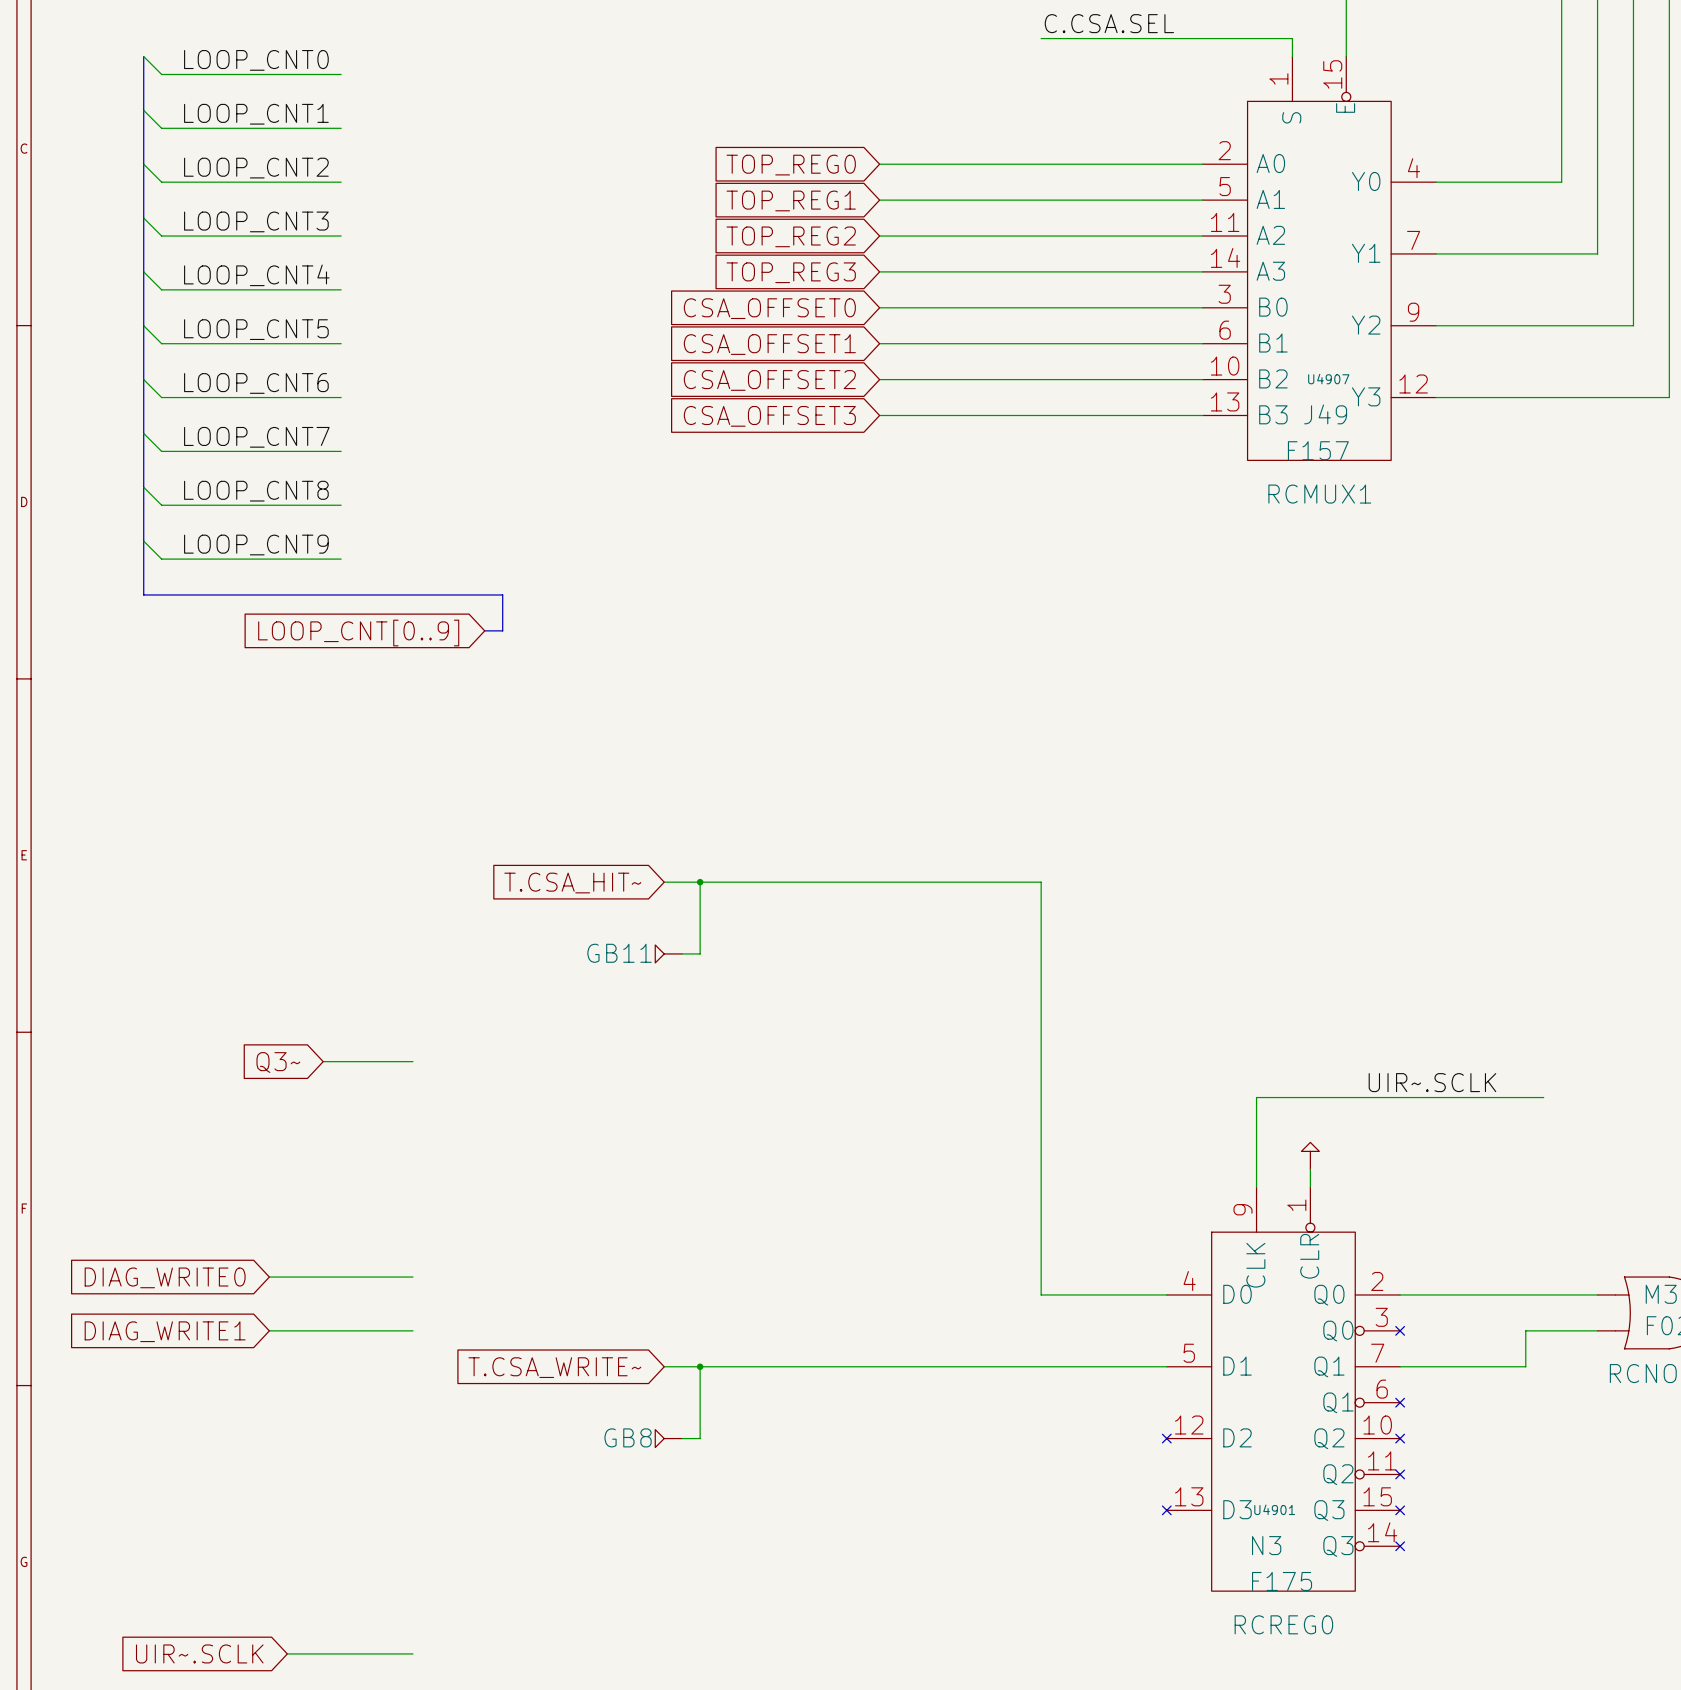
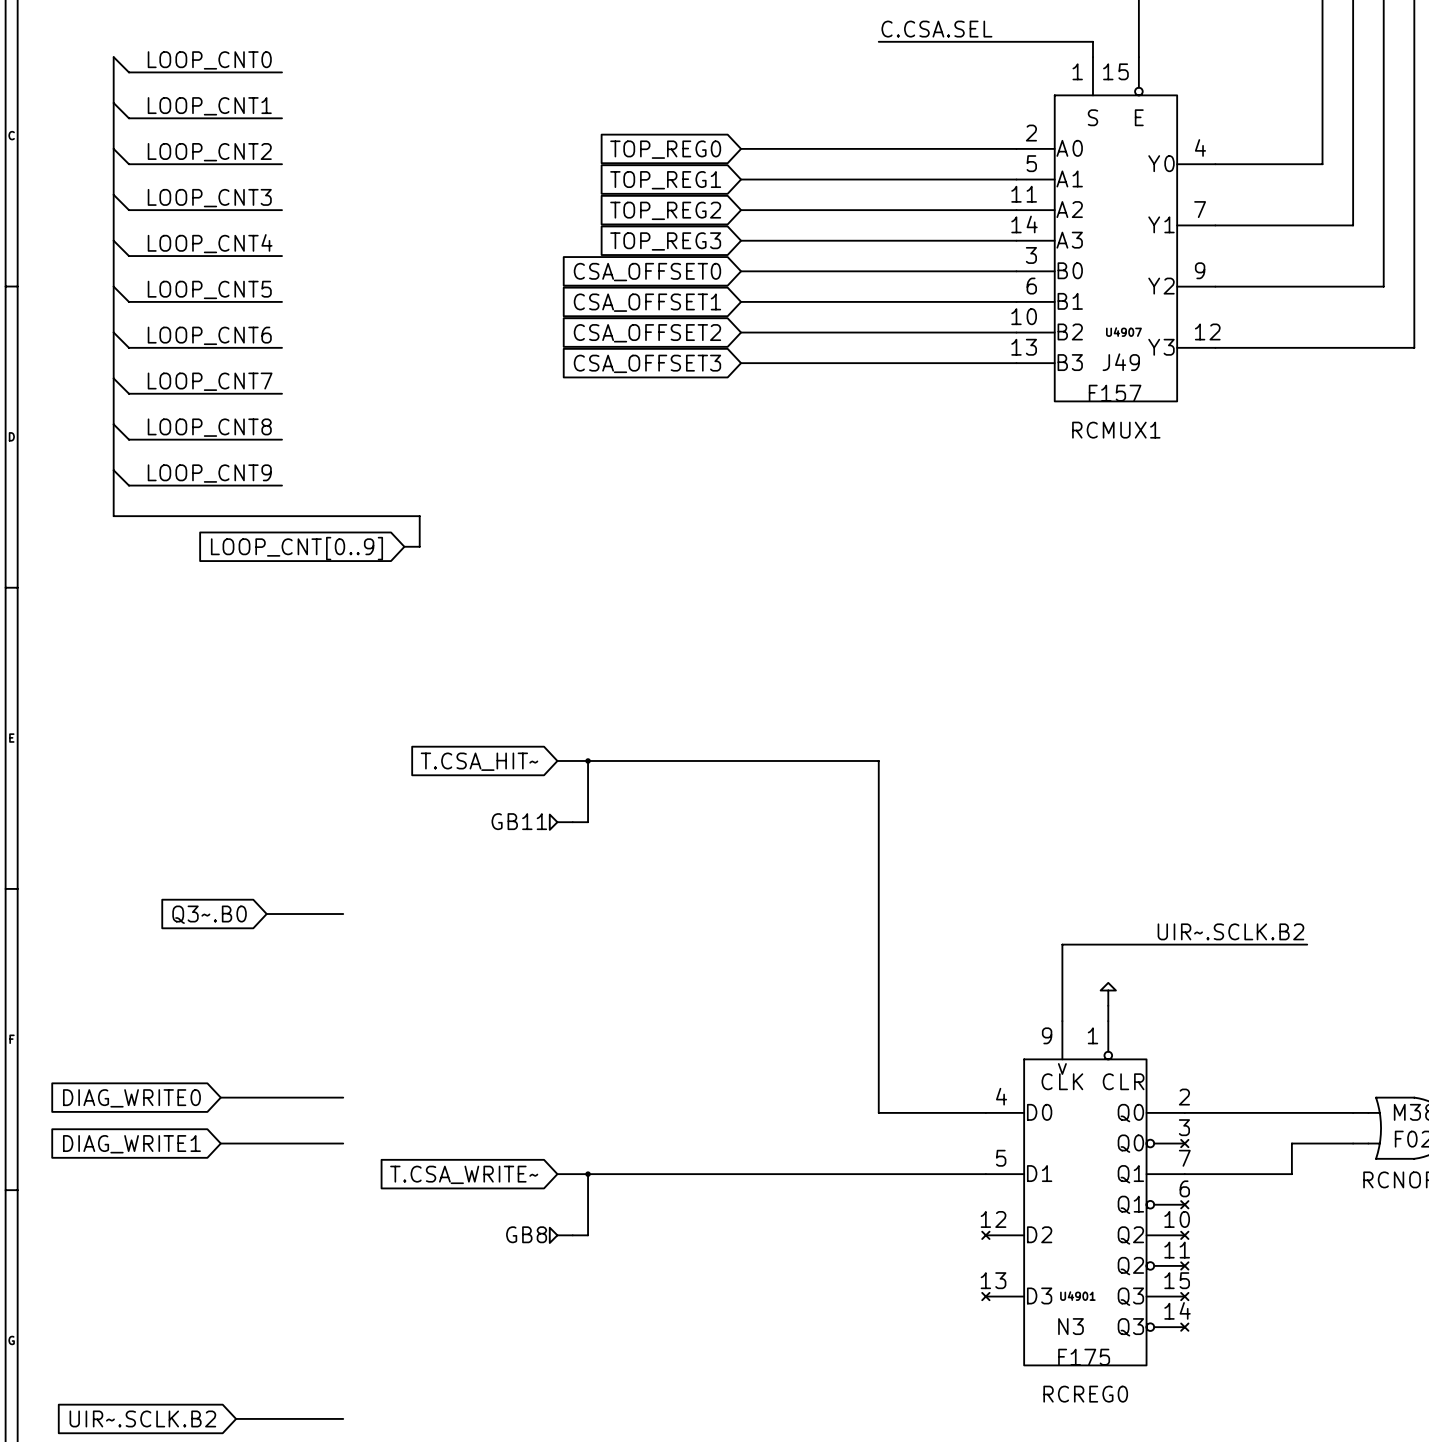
U4907 symbol: [1202, 56, 1437, 461] -> [1016, 57, 1216, 402]
global label: Q3~ (278, 1062) -> Q3~.B0 (209, 914)
label: UIR~.SCLK (1432, 1082) -> UIR~.SCLK.B2 (1230, 931)
U4901 symbol: [1166, 1187, 1401, 1592] -> [985, 1021, 1185, 1366]
global label: UIR~.SCLK (199, 1653) -> UIR~.SCLK.B2 (142, 1418)

